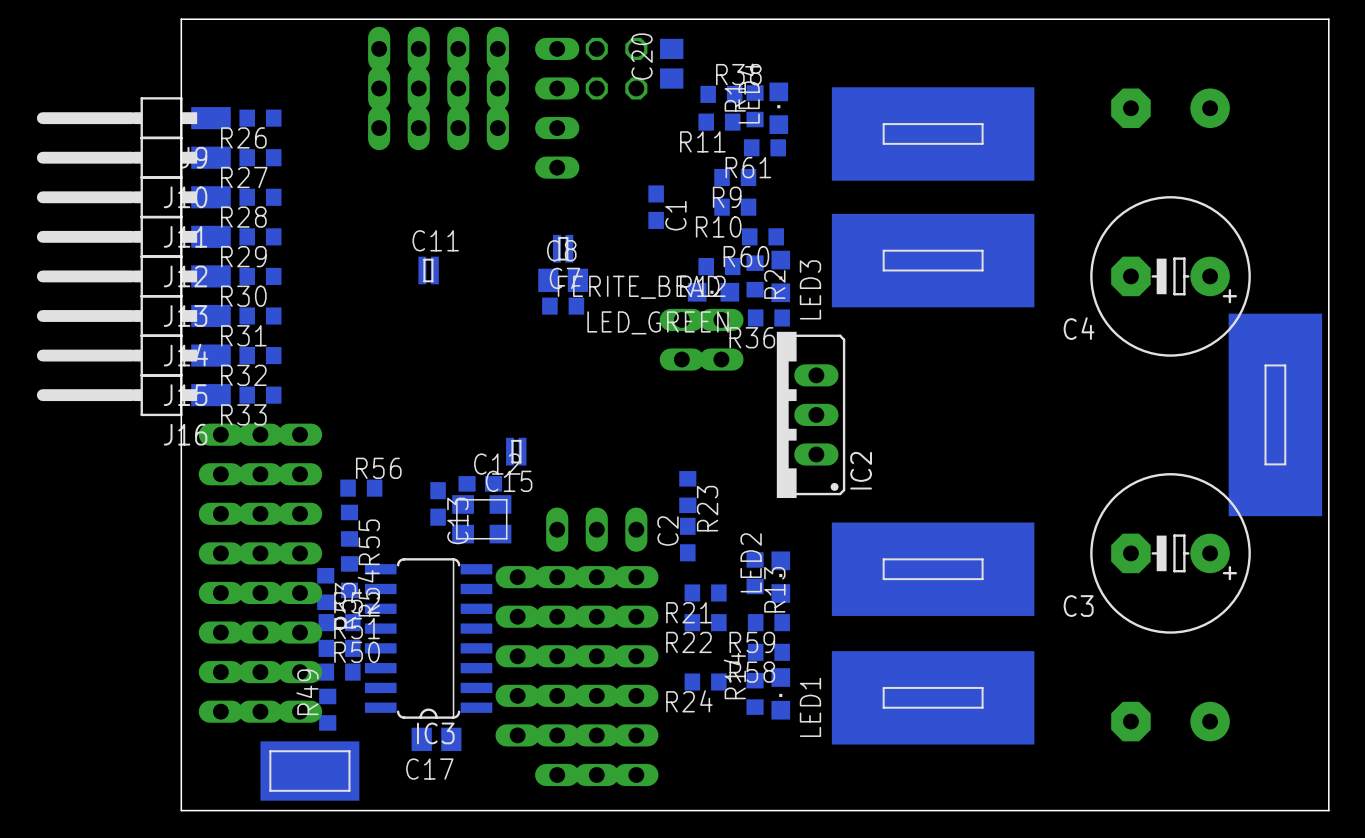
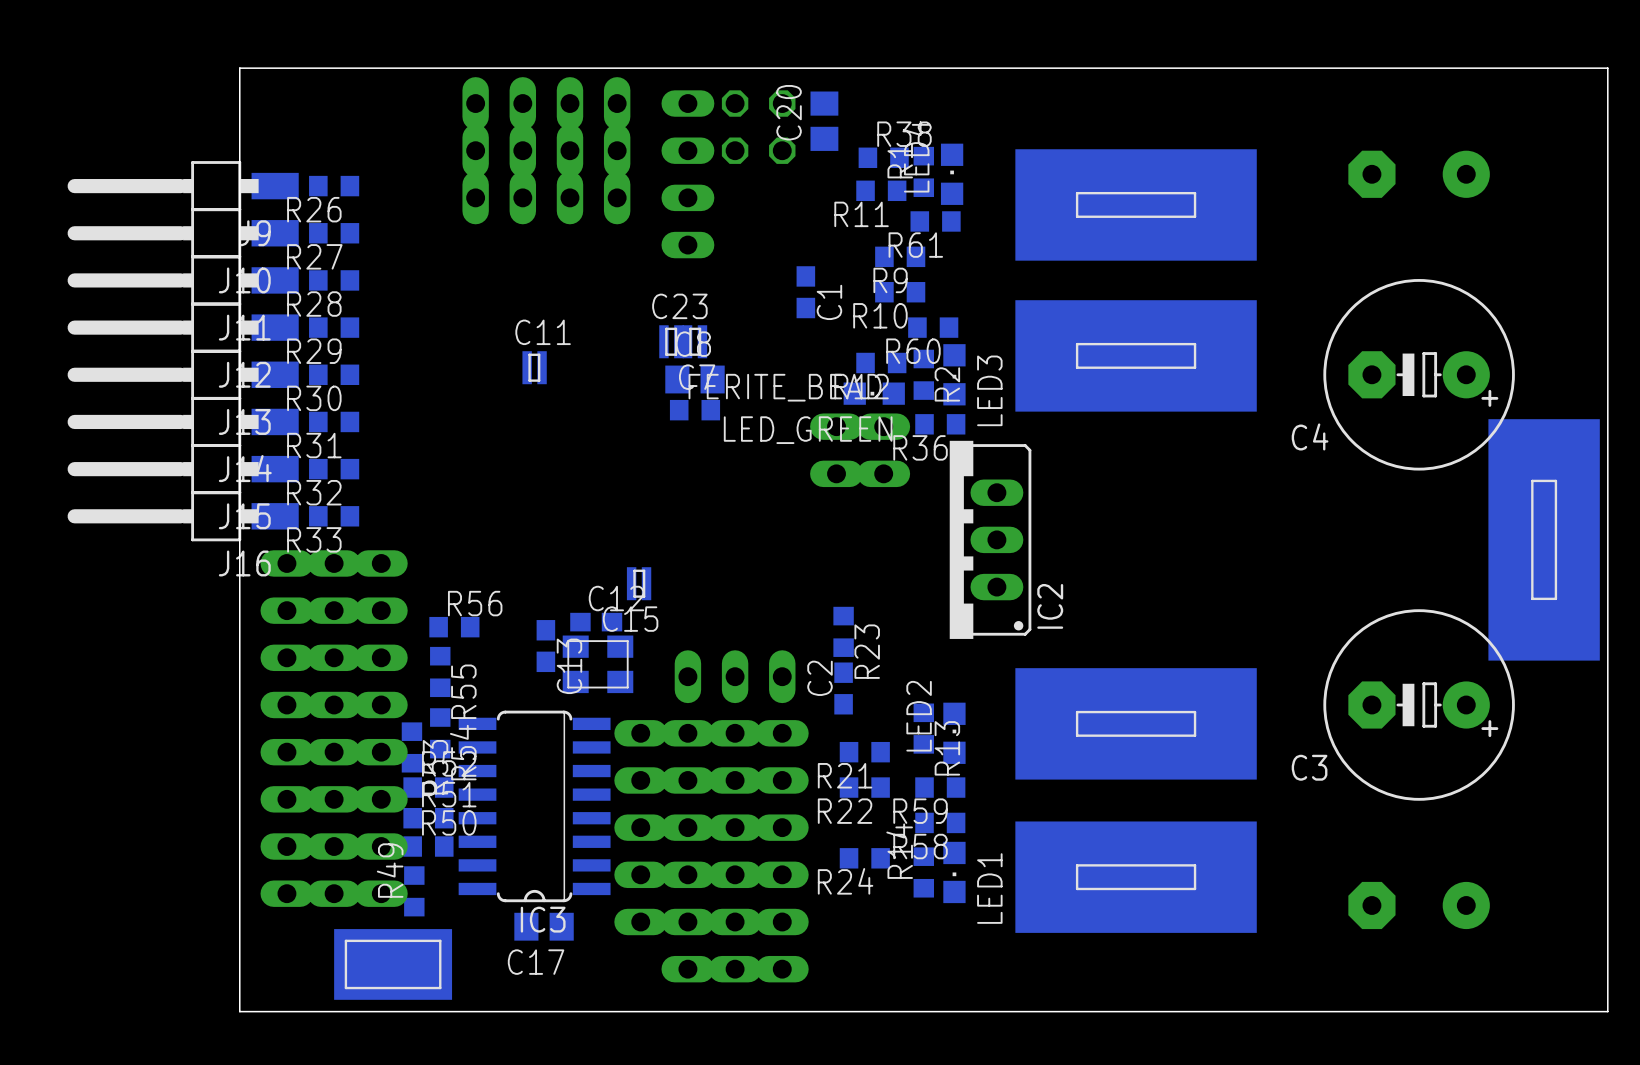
C23: none -> (671, 341)

